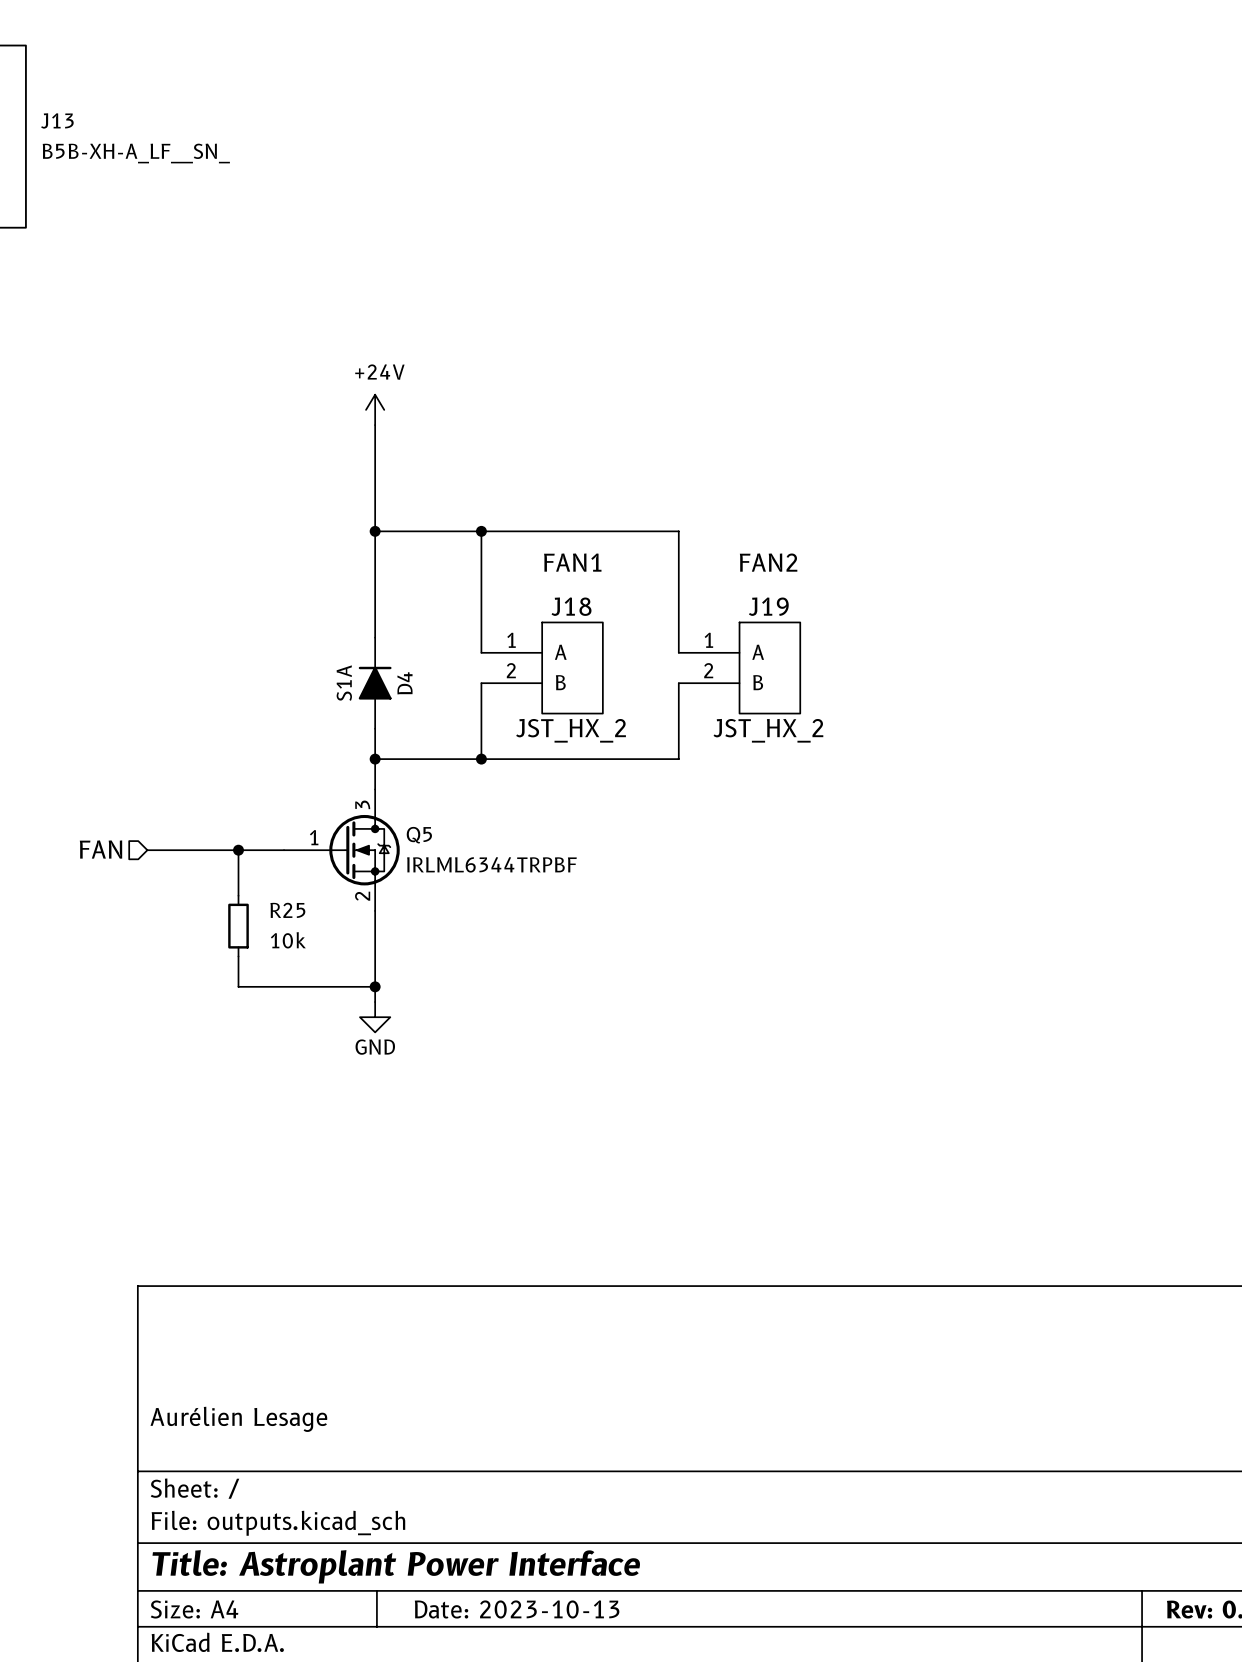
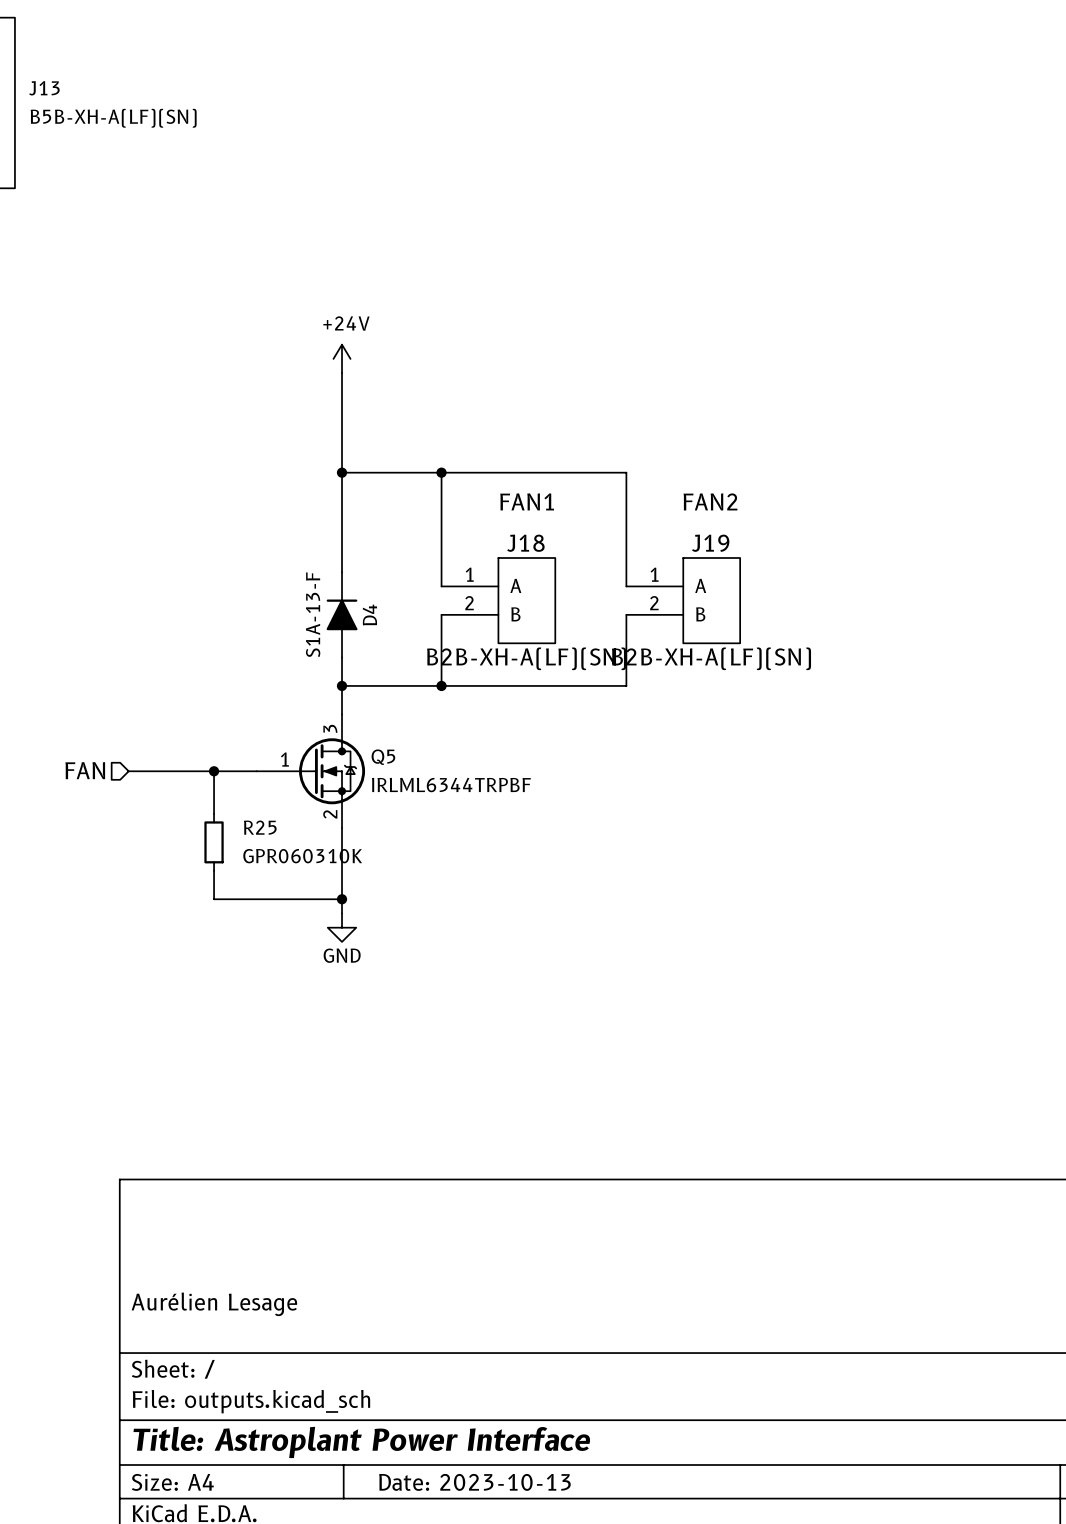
J13 value: B5B-XH-A_LF__SN_ (136, 153) -> B5B-XH-A(LF)(SN) (113, 118)
D4 value: S1A (344, 683) -> S1A-13-F (313, 614)
J18 value: JST_HX_2 (571, 730) -> B2B-XH-A(LF)(SN) (526, 658)
J19 value: JST_HX_2 (768, 730) -> B2B-XH-A(LF)(SN) (711, 658)
R25 value: 10k (288, 940) -> GPR060310K (302, 856)

